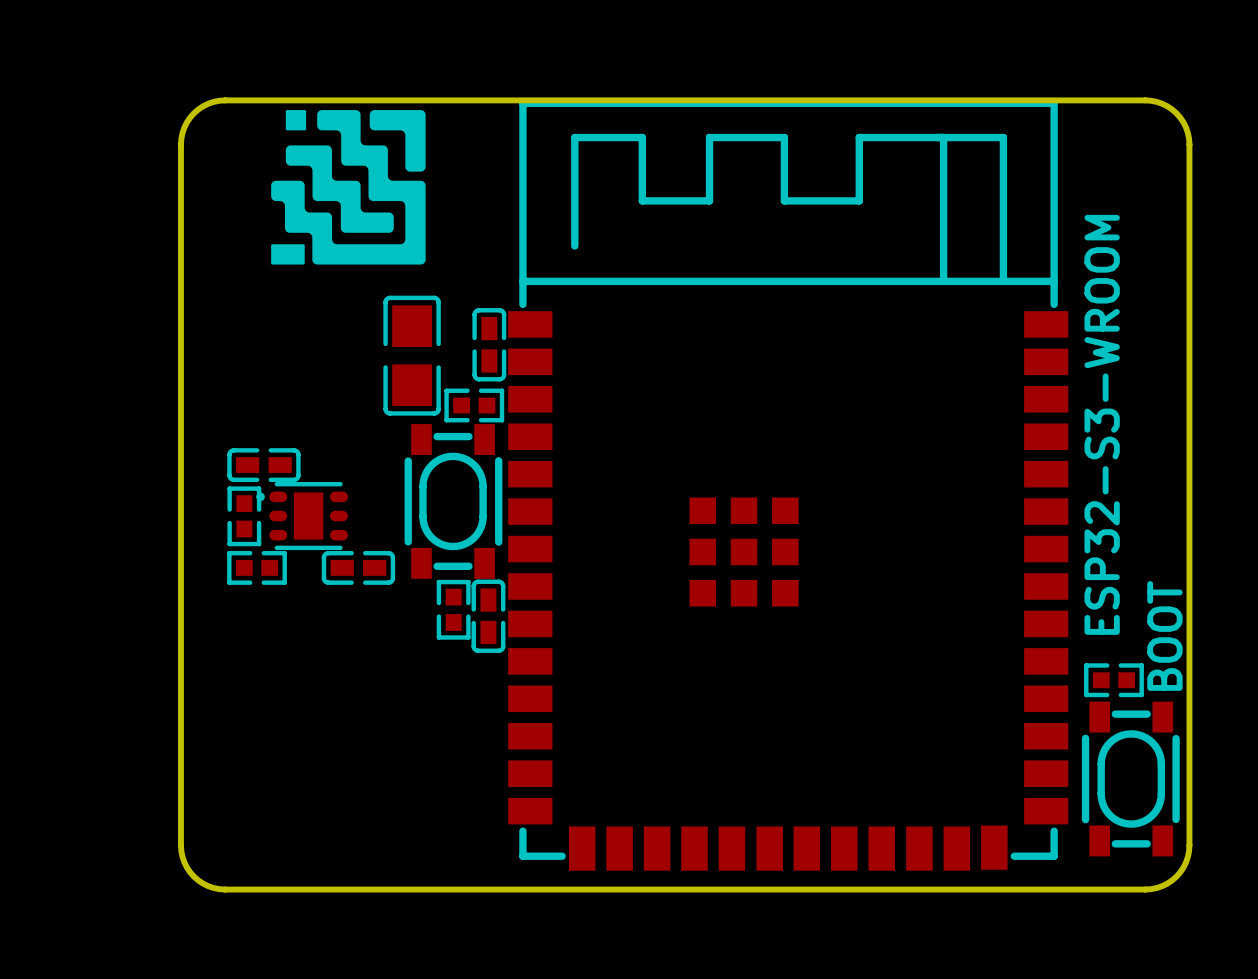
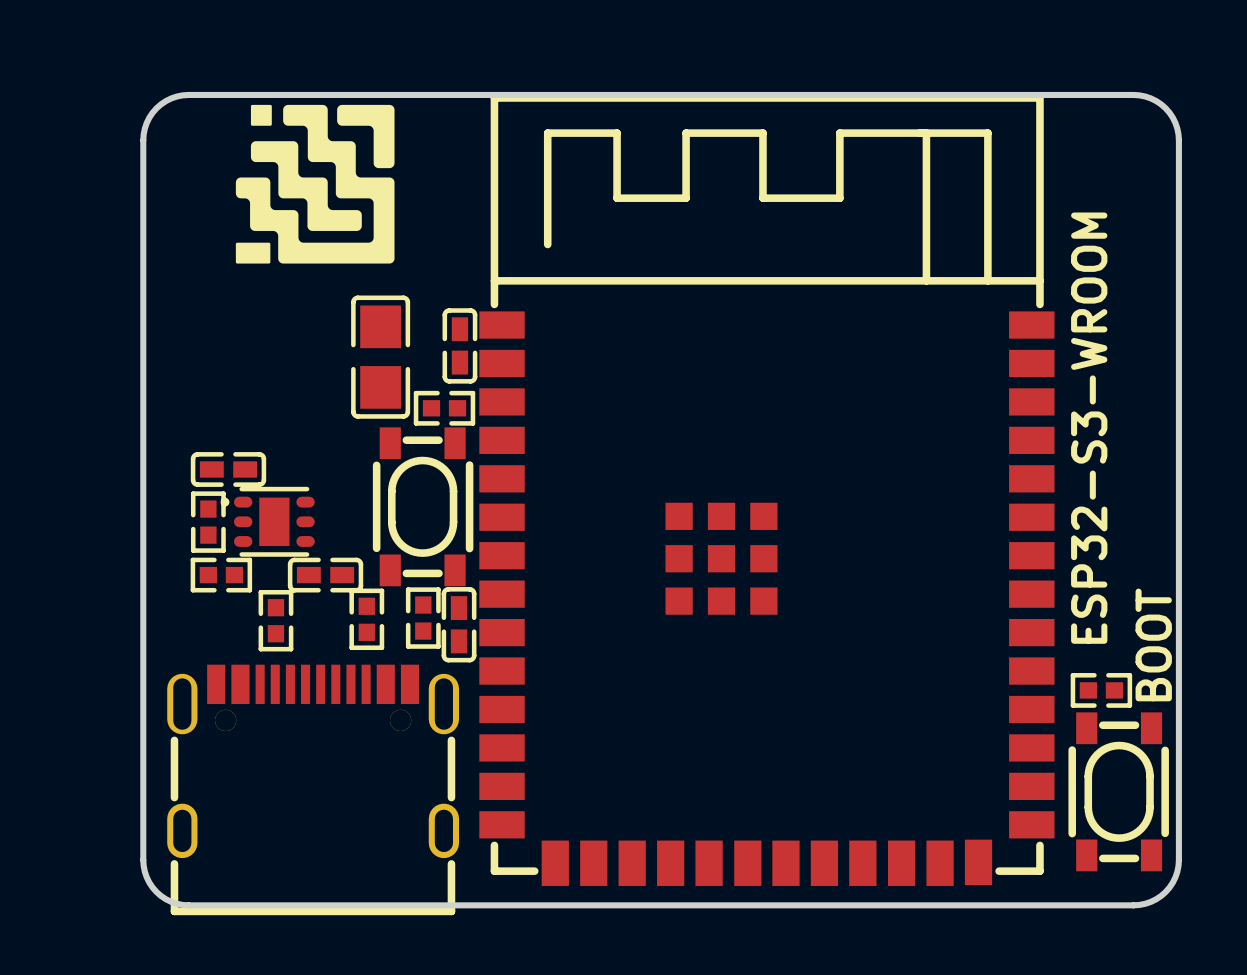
part: none -> (366, 619)
part: none -> (275, 620)
part: none -> (313, 789)

